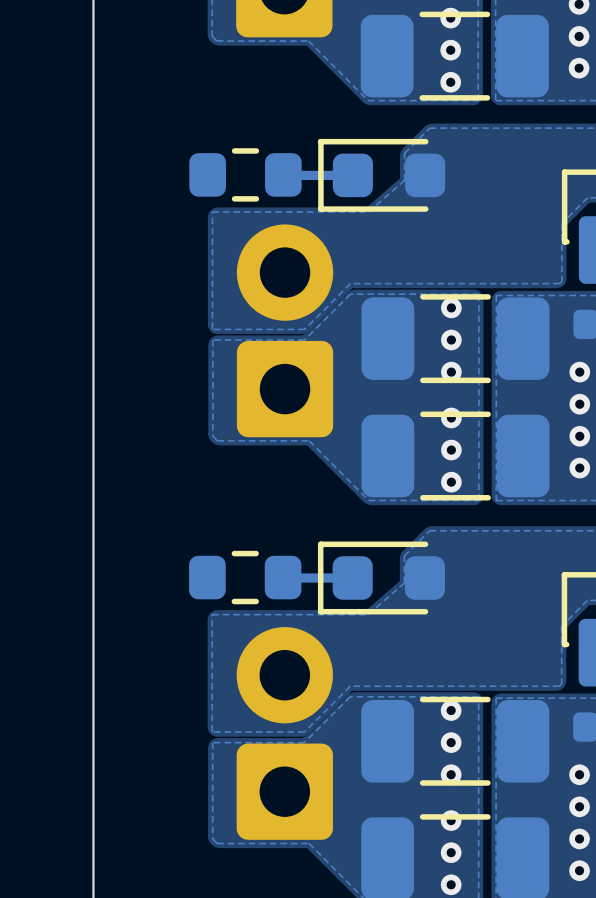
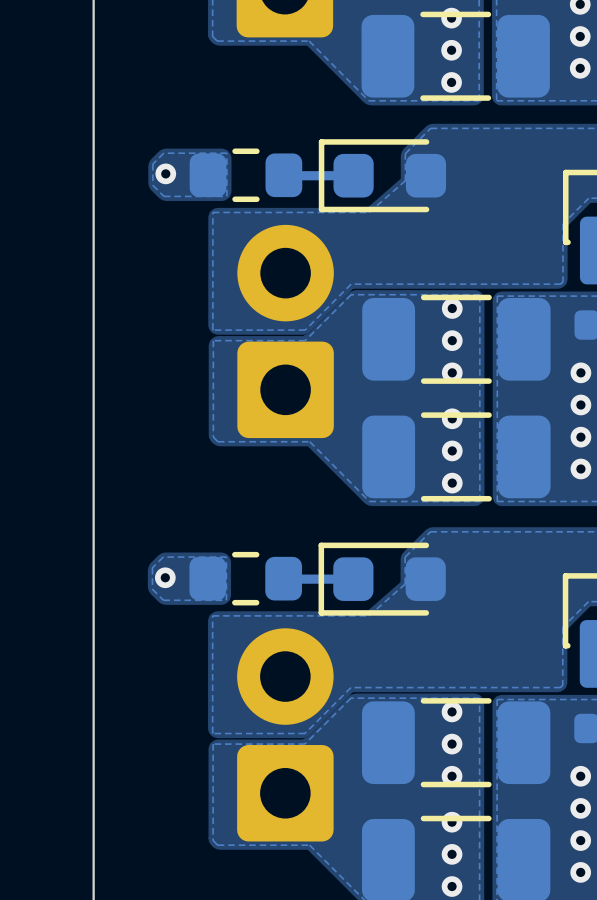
zone outline: none -> (226, 153) (163, 153) (152, 164) (152, 185) (163, 196) (226, 196) (226, 153)
via: none -> (165, 173)
zone outline: none -> (226, 557) (163, 557) (152, 567) (152, 589) (163, 600) (226, 600) (226, 557)
via: none -> (165, 577)

